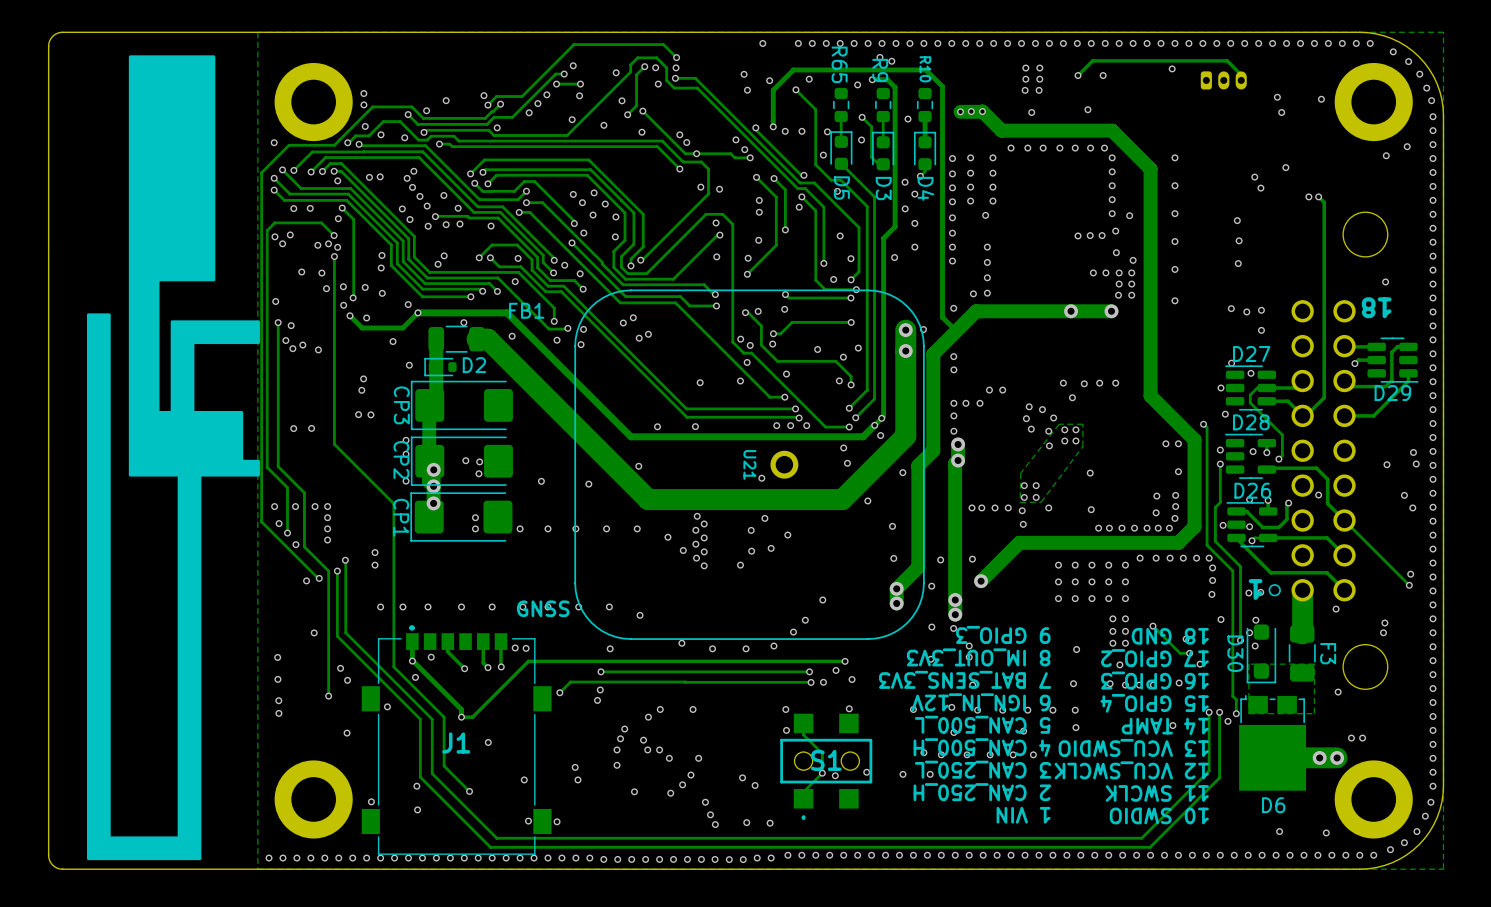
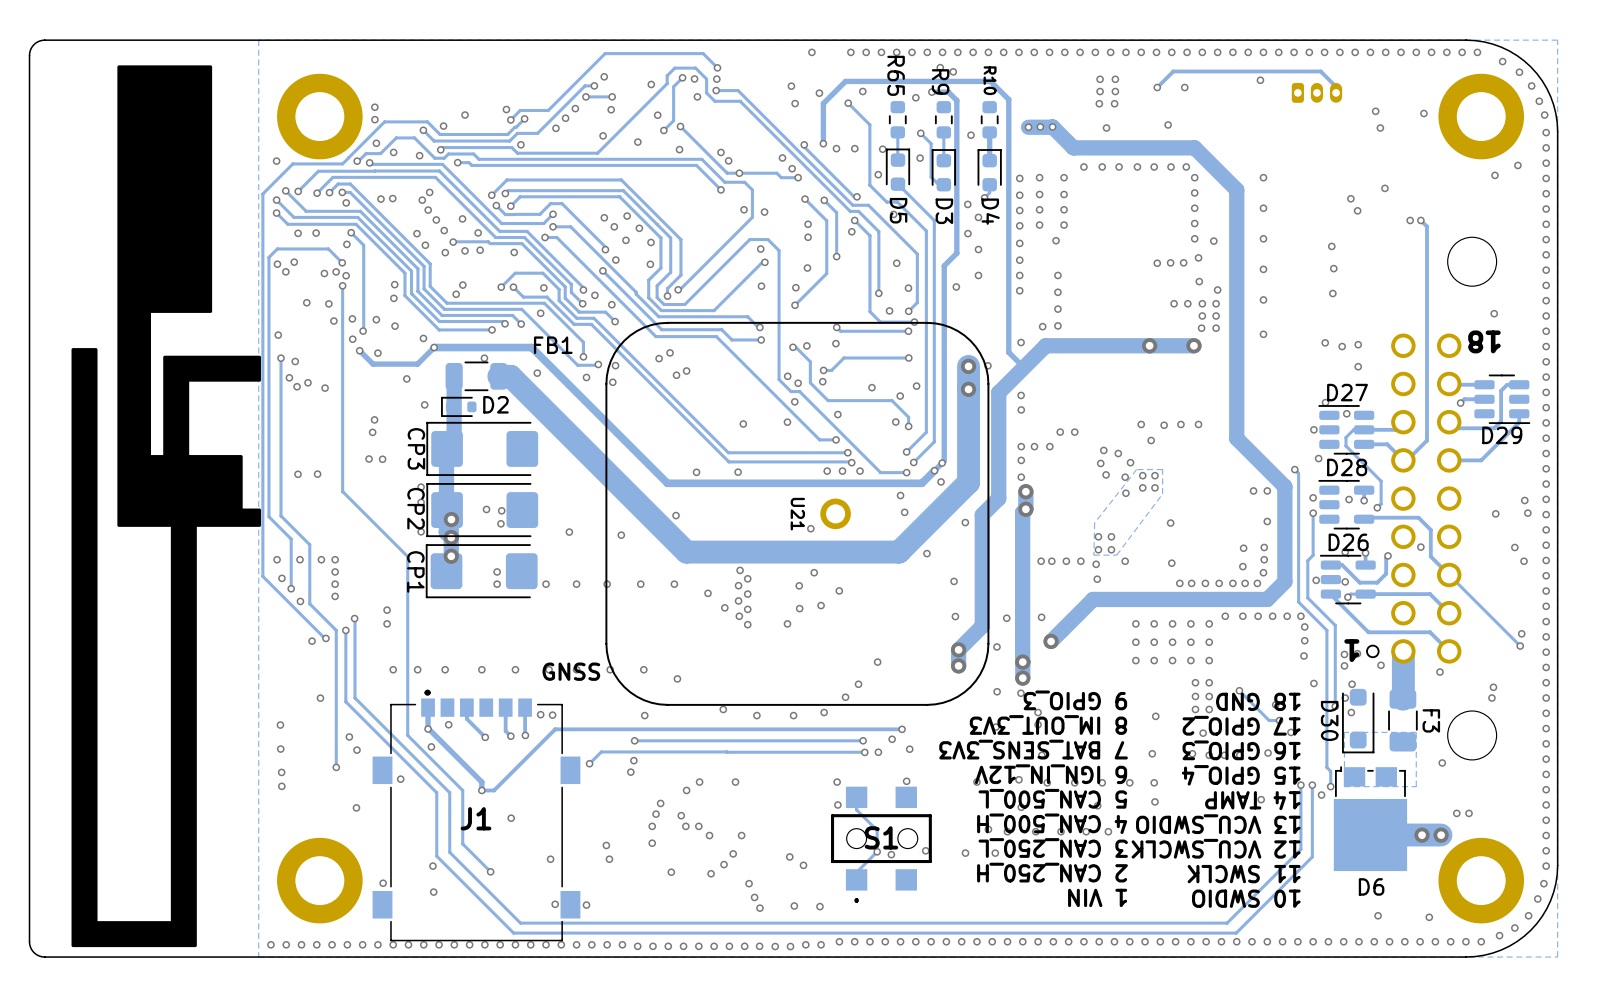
via: none -> (1380, 665)
via: none -> (1344, 665)

